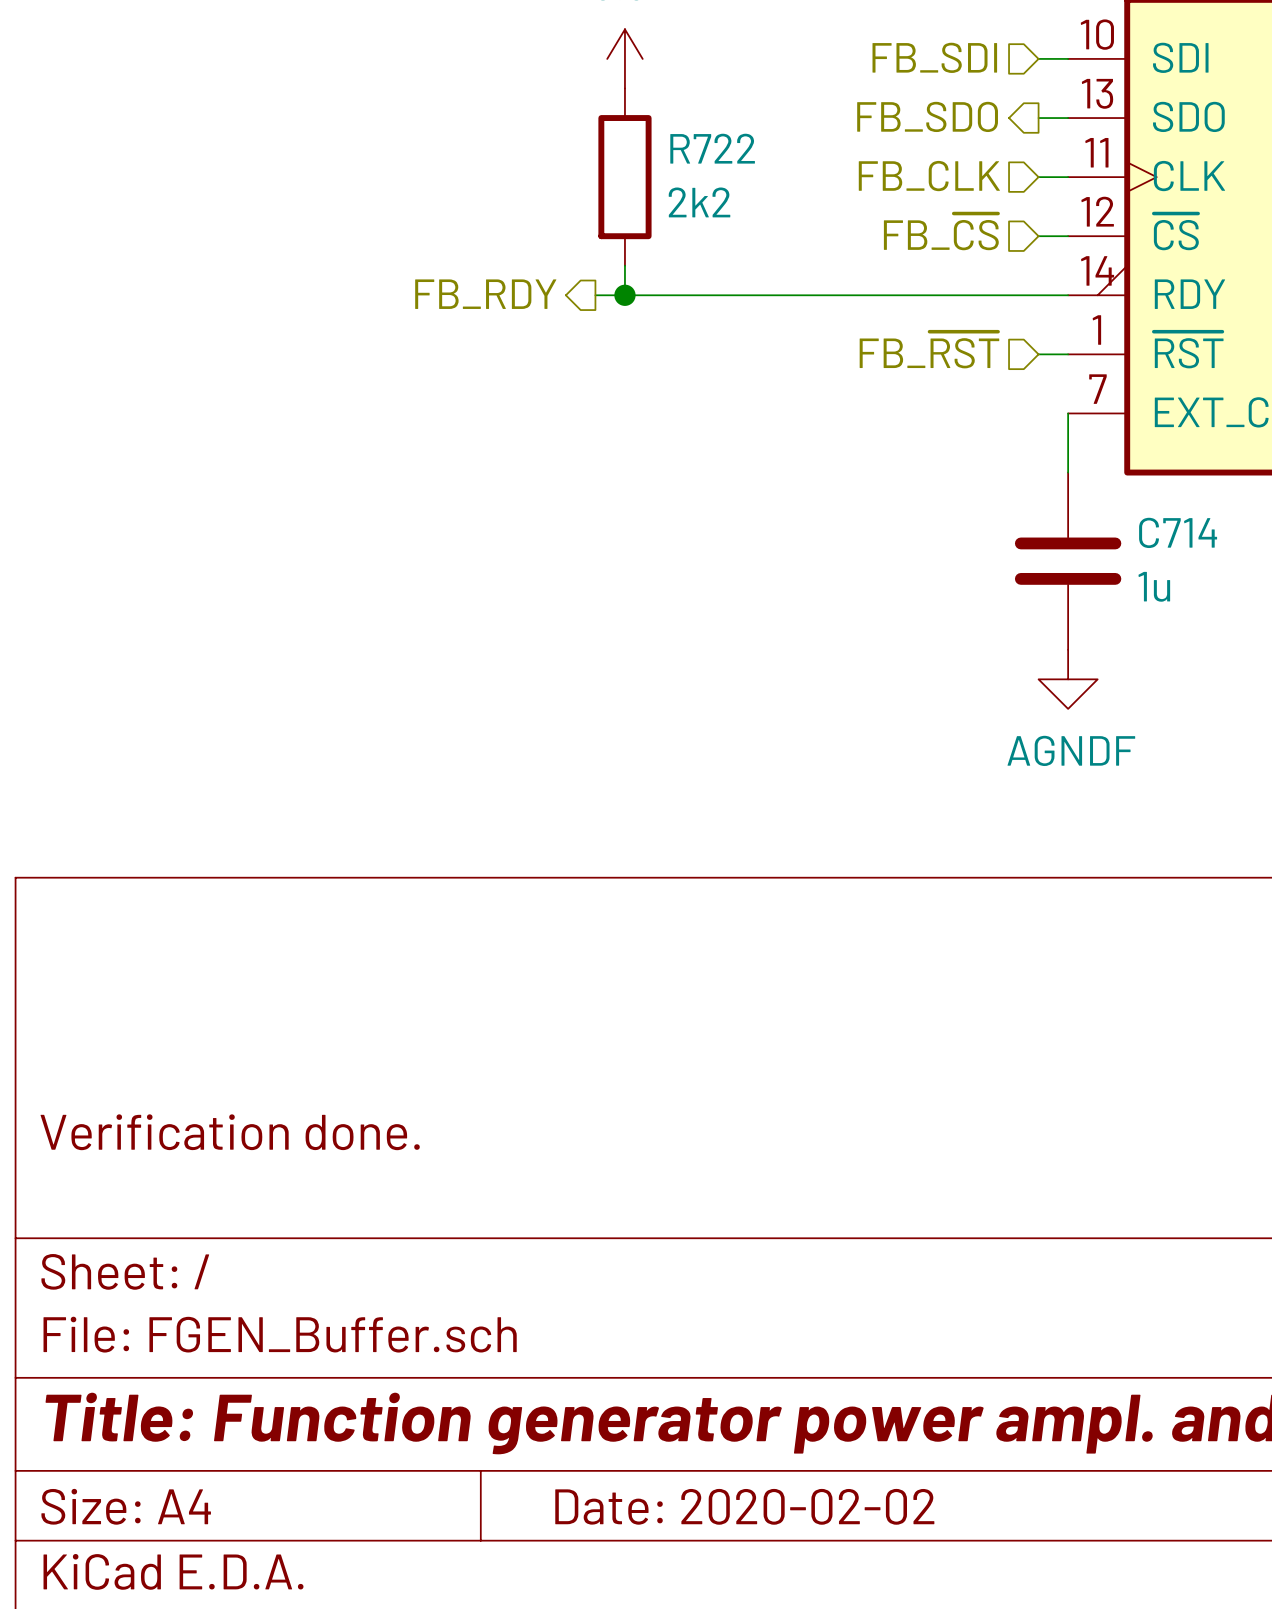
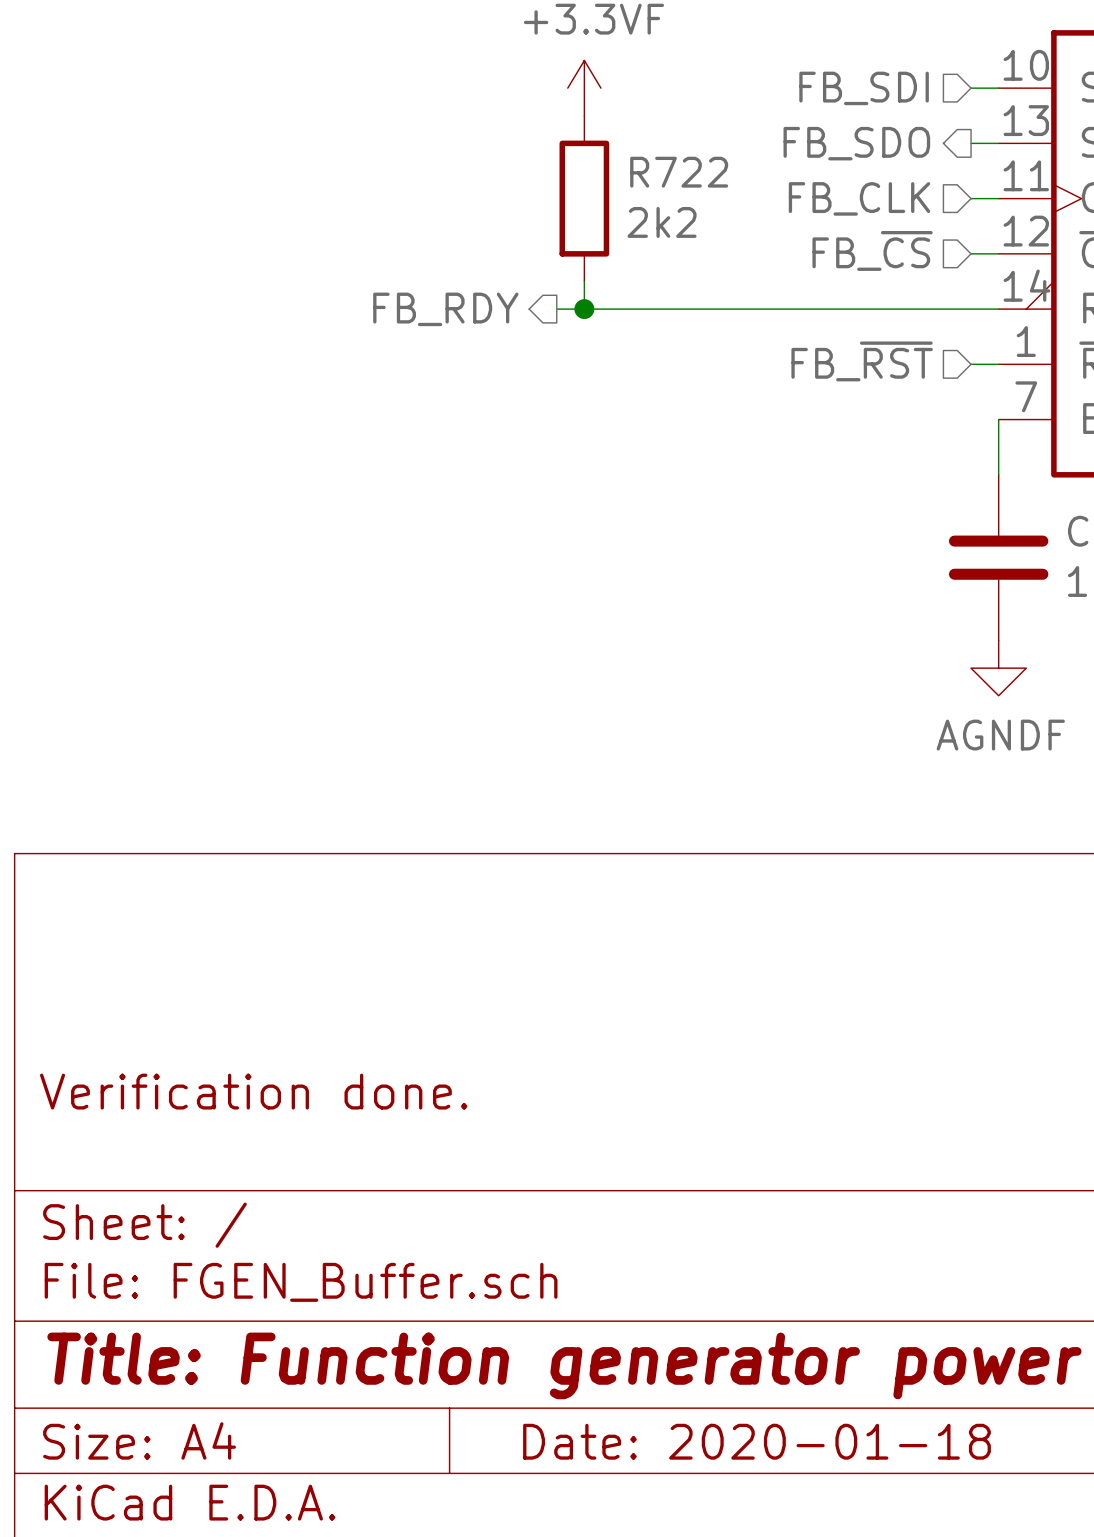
title block: Date: 2020-02-02 (744, 1506) -> Date: 2020-01-18 (757, 1441)

